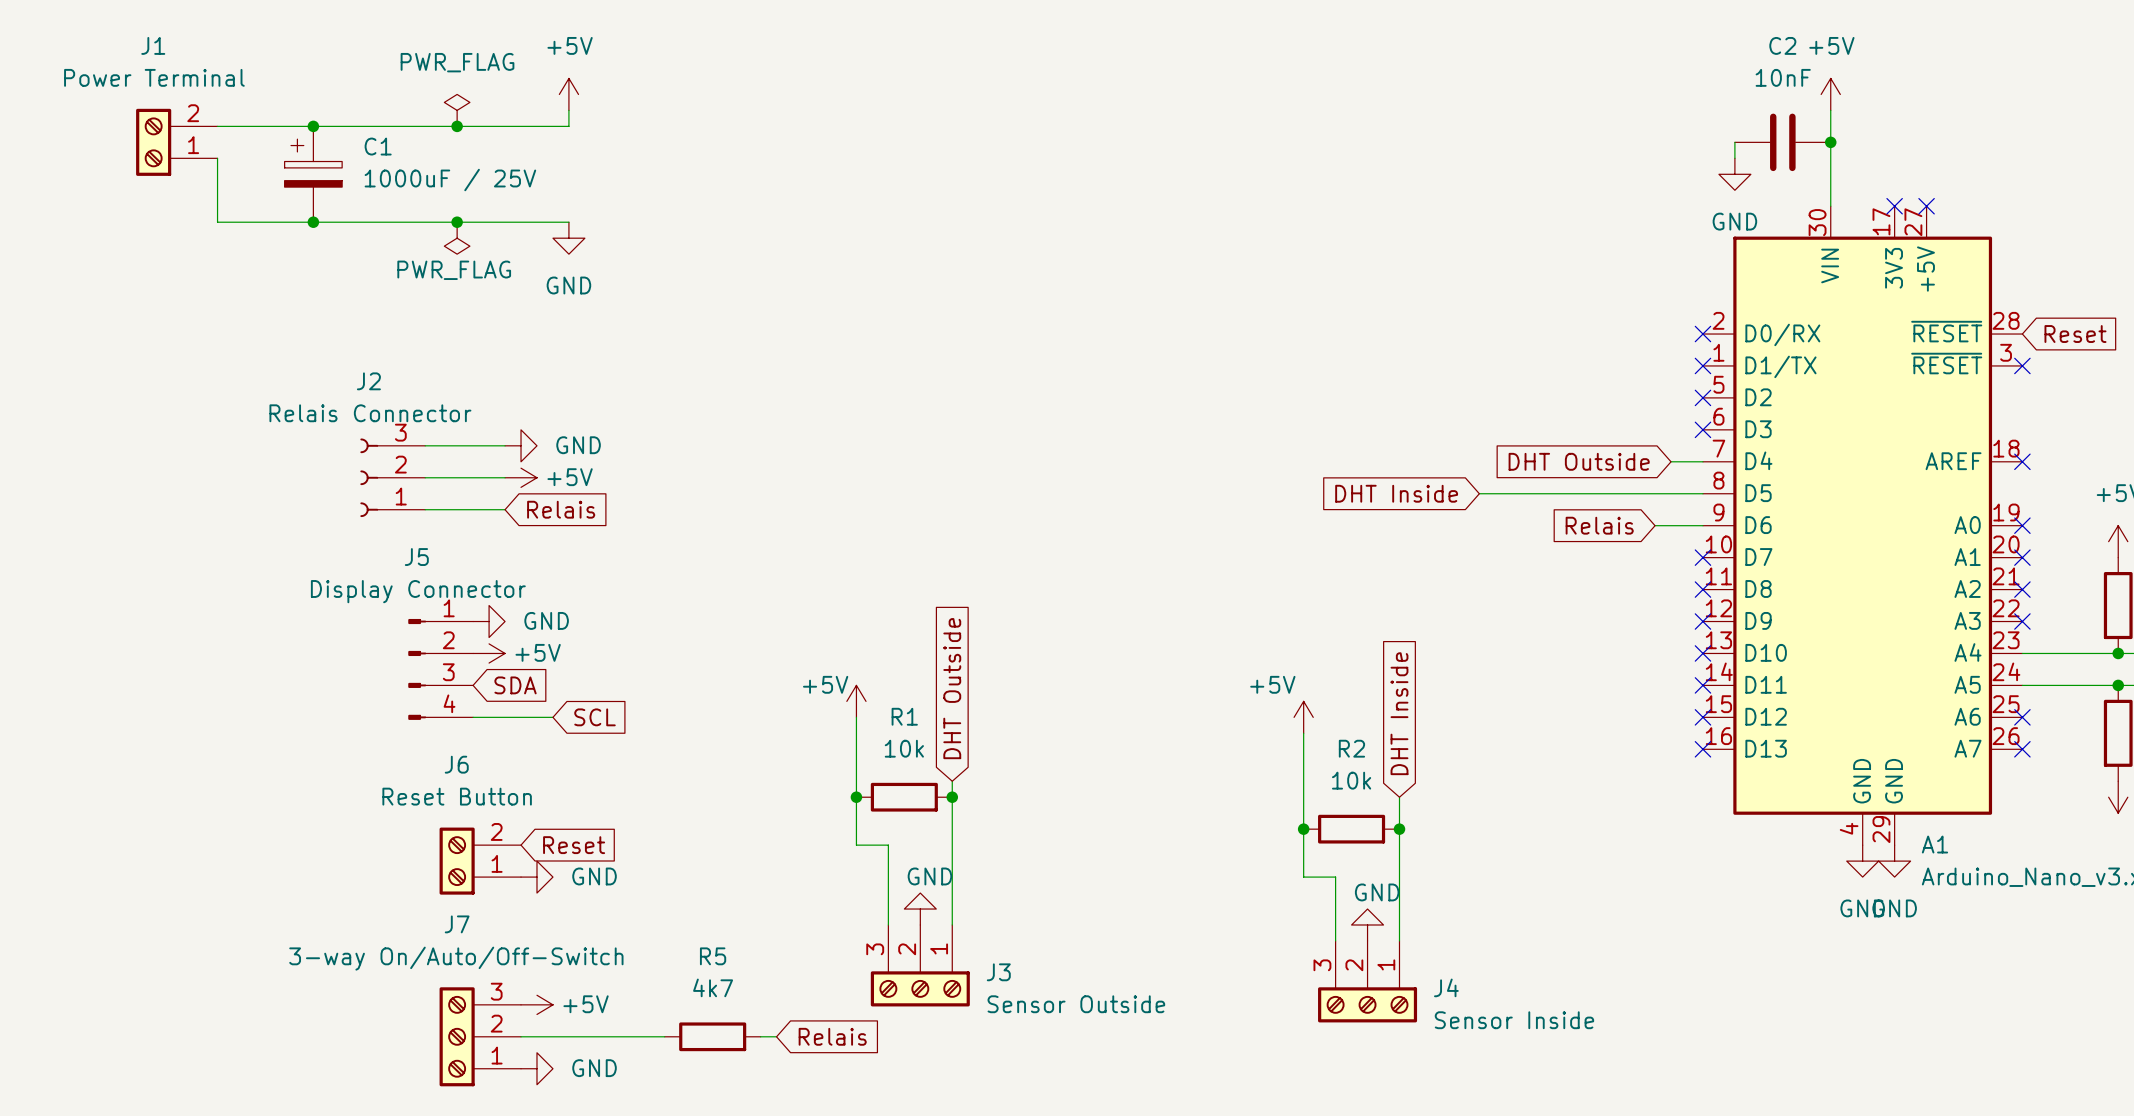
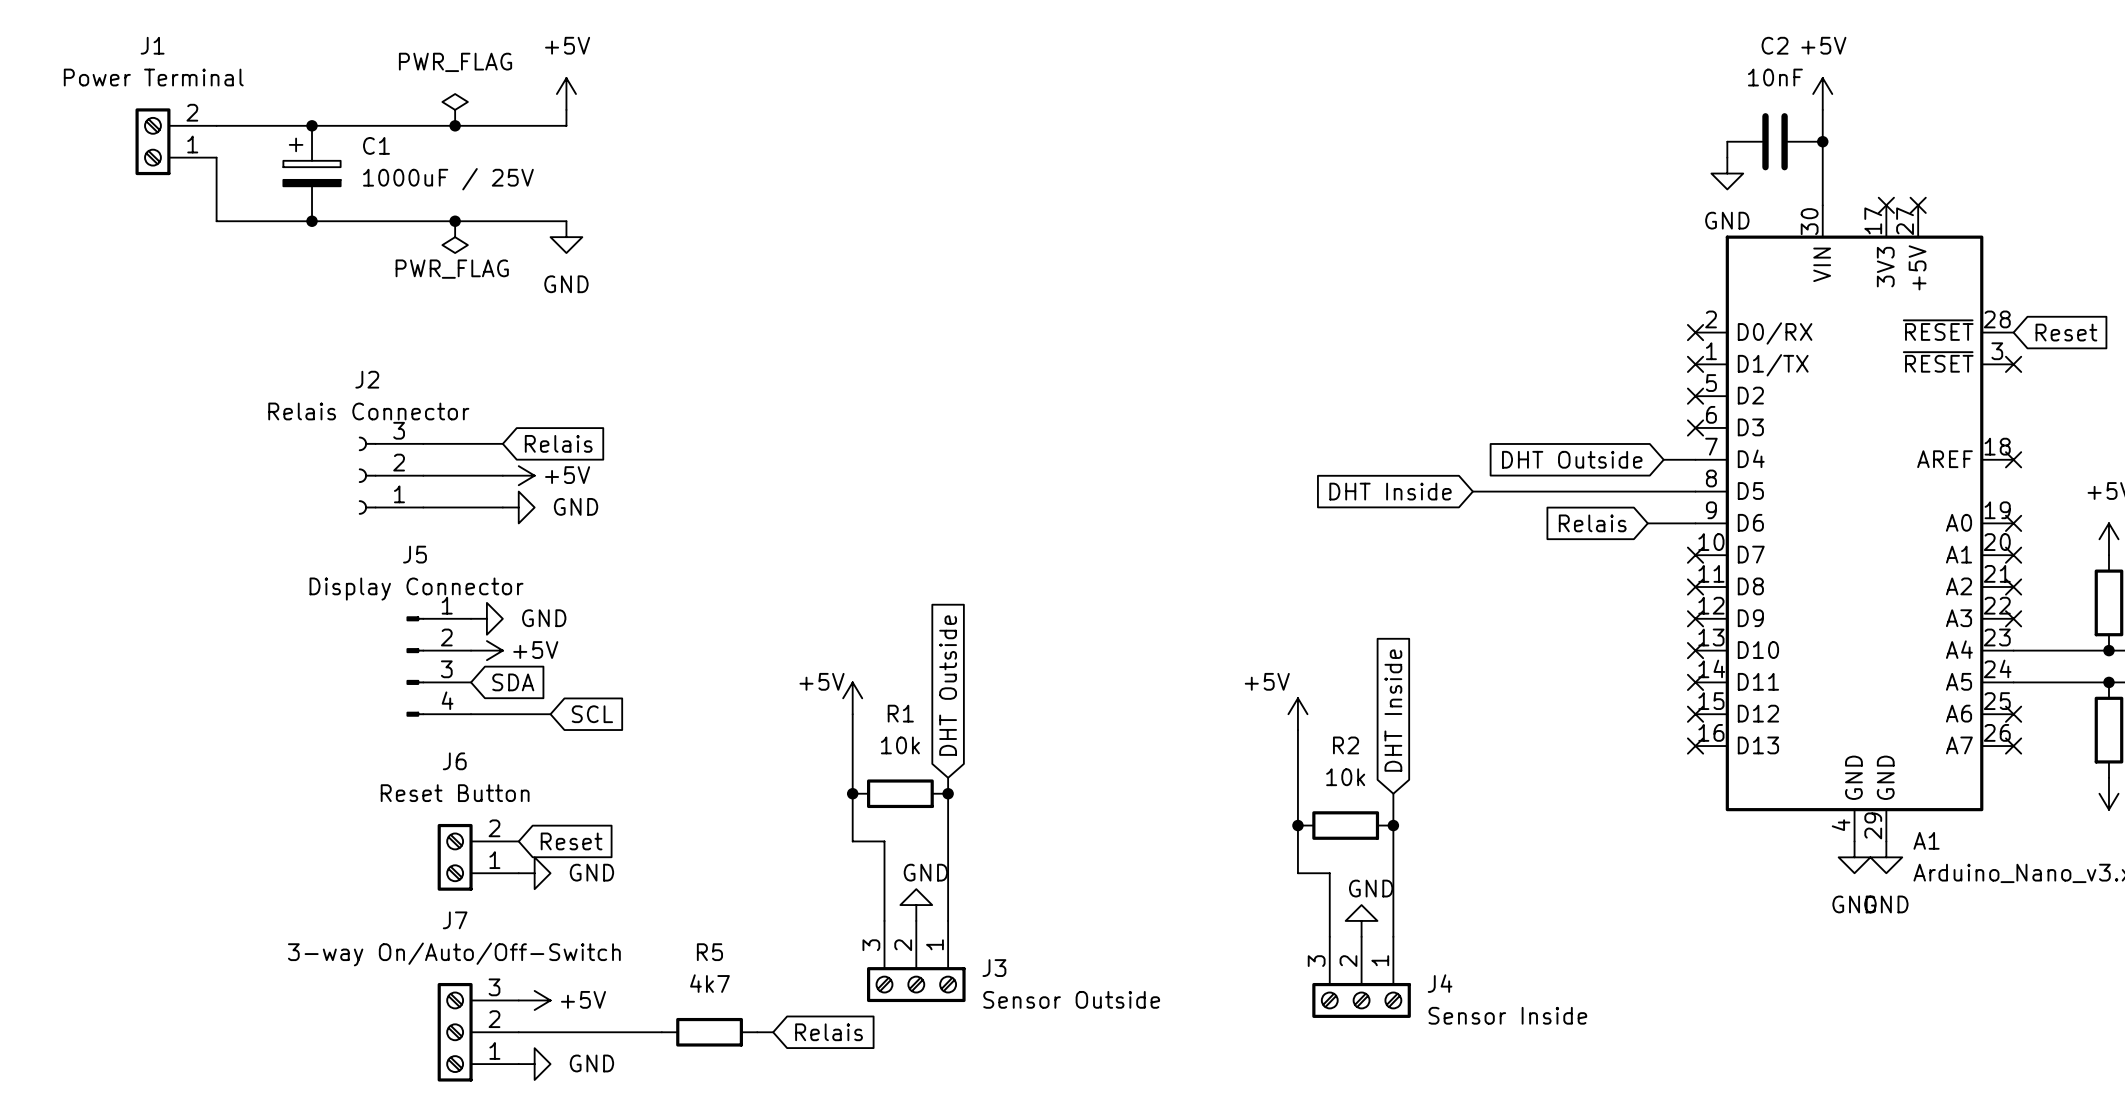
power symbol position: GND (521, 445) -> GND (518, 507)
global label position: Relais (561, 509) -> Relais (558, 443)

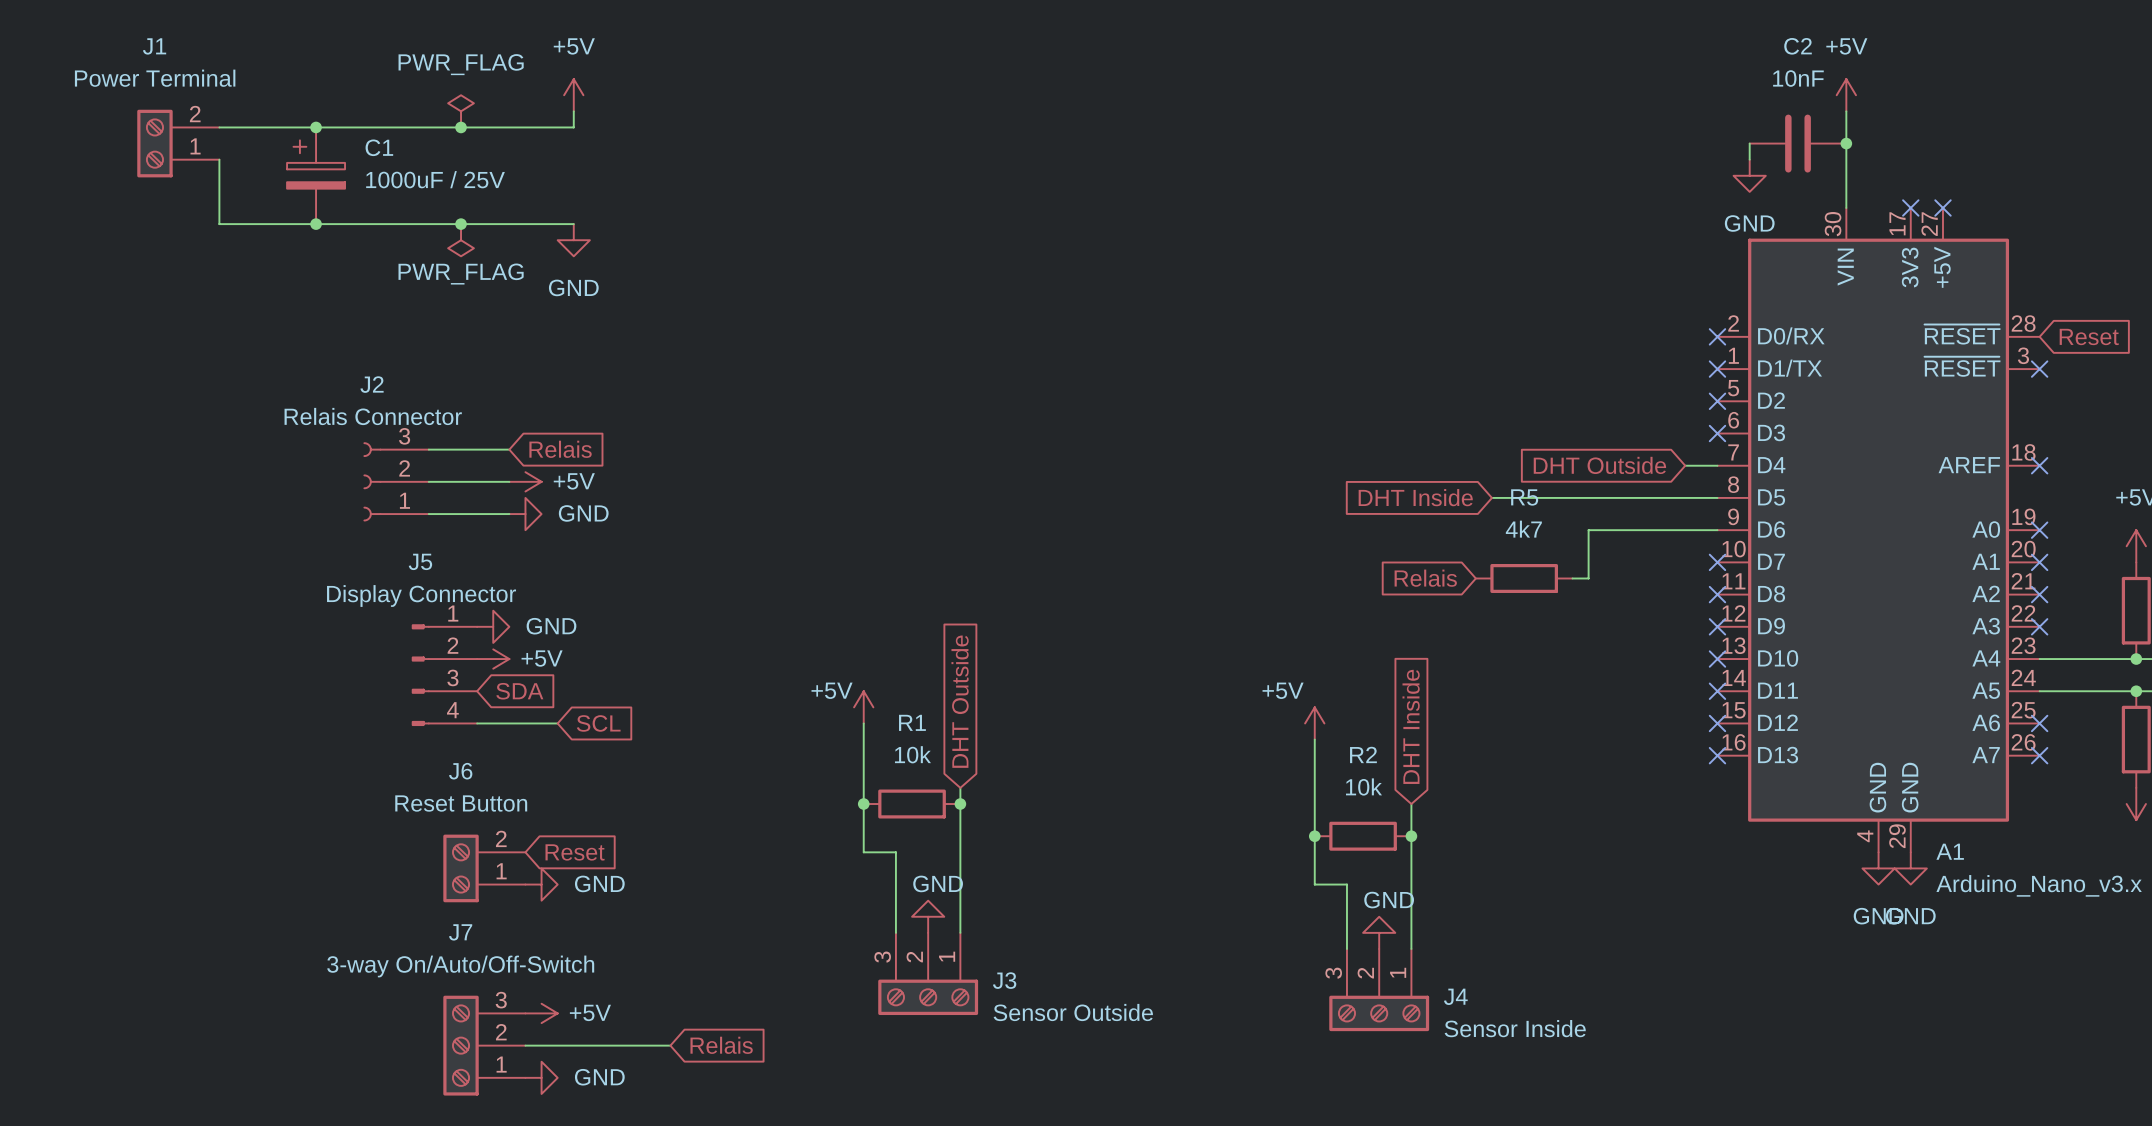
global label position: Relais (1592, 523) -> Relais (1425, 578)
wire: none -> (1669, 530) (1588, 530) (1588, 578) (1572, 578)
R5 position: (709, 1032) -> (1524, 578)
wire: (757, 1032) (773, 1032) -> none
global label position: Relais (829, 1032) -> Relais (721, 1045)

